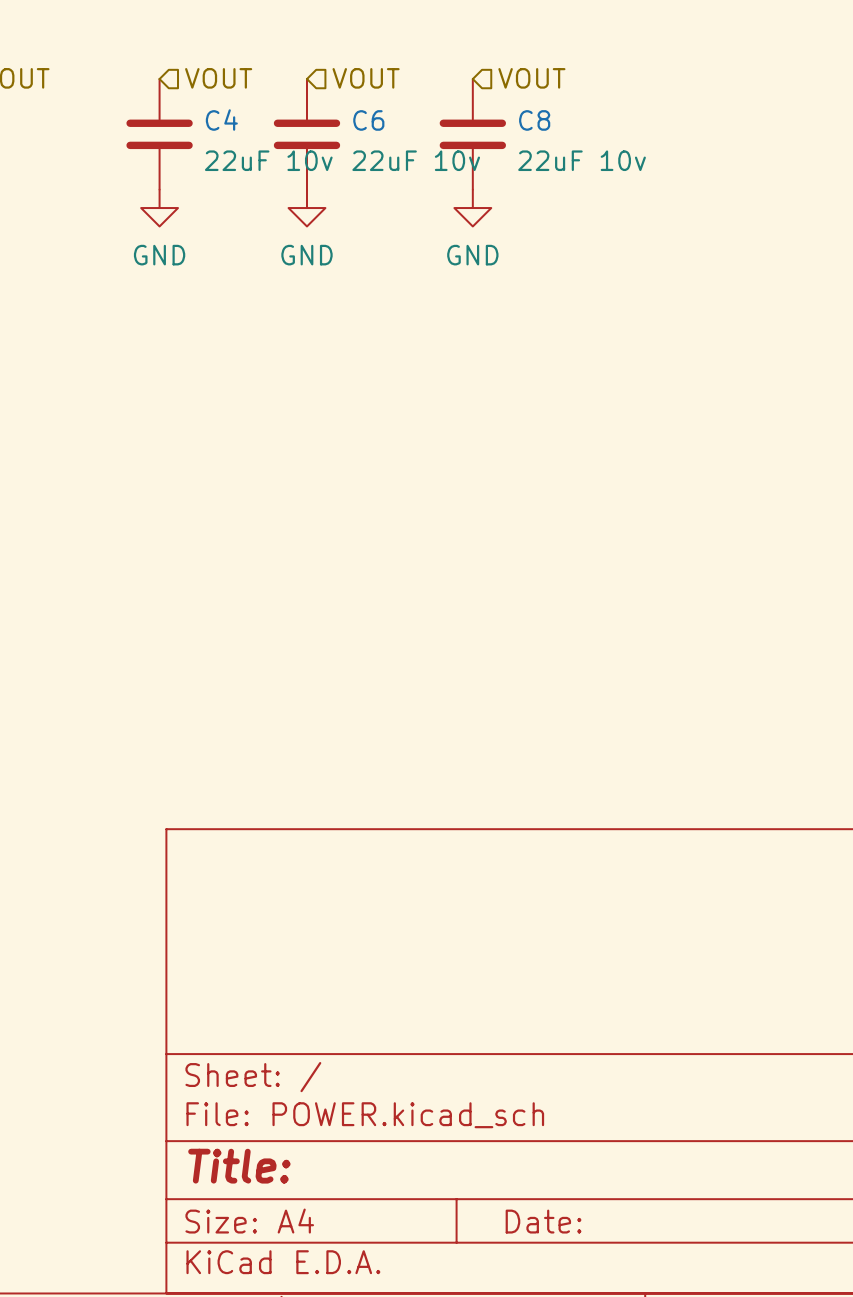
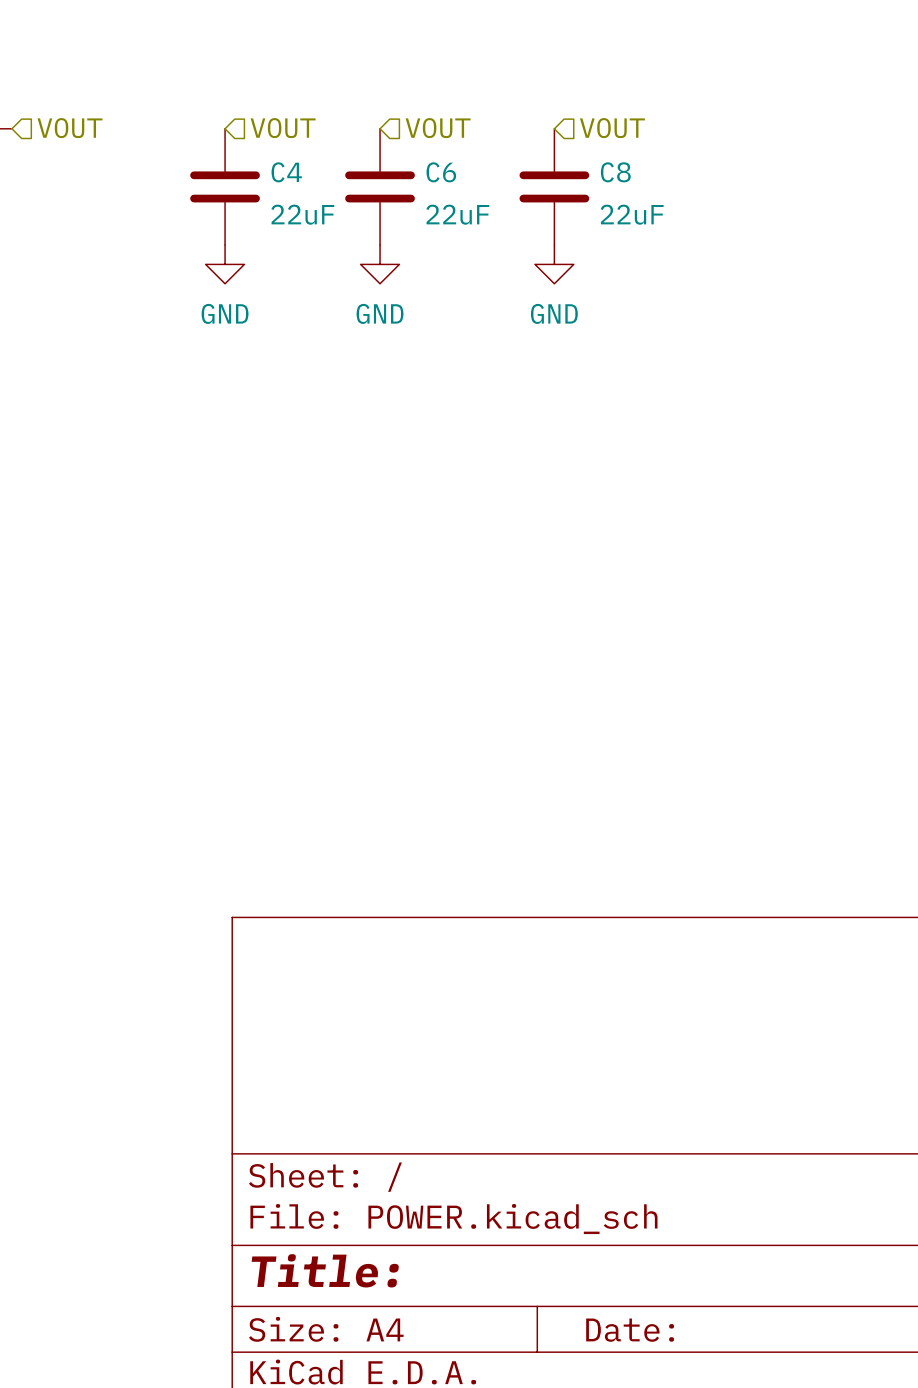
C4 value: 22uF 10v (268, 160) -> 22uF (302, 214)
C6 value: 22uF 10v (416, 160) -> 22uF (457, 214)
C8 value: 22uF 10v (582, 160) -> 22uF (632, 214)

